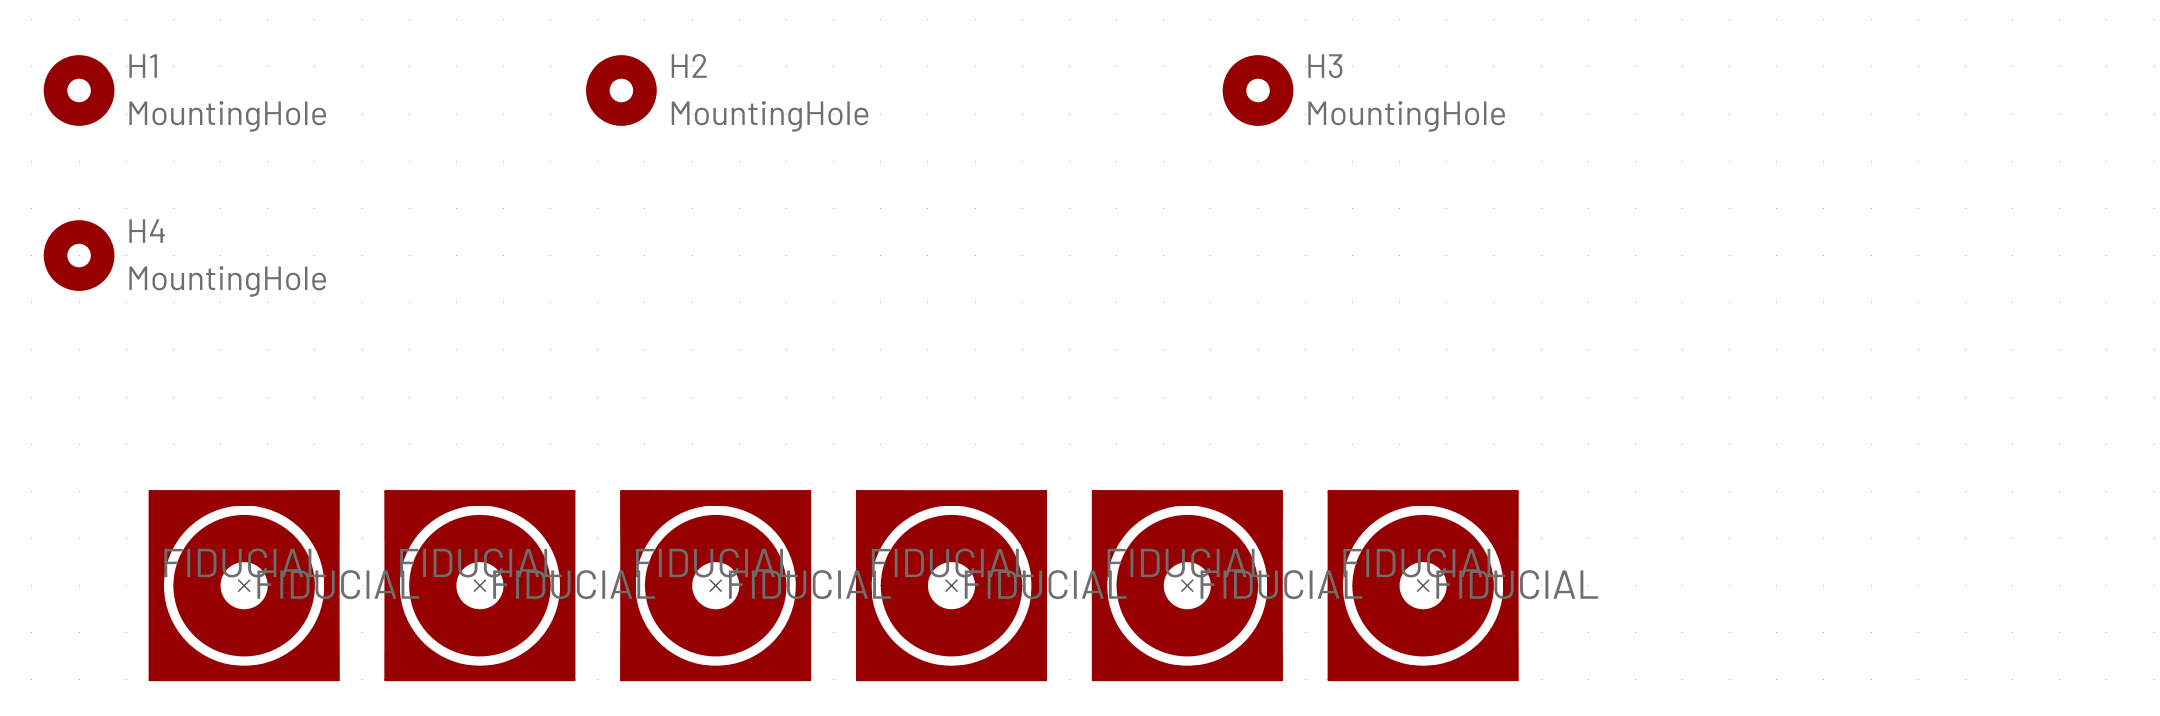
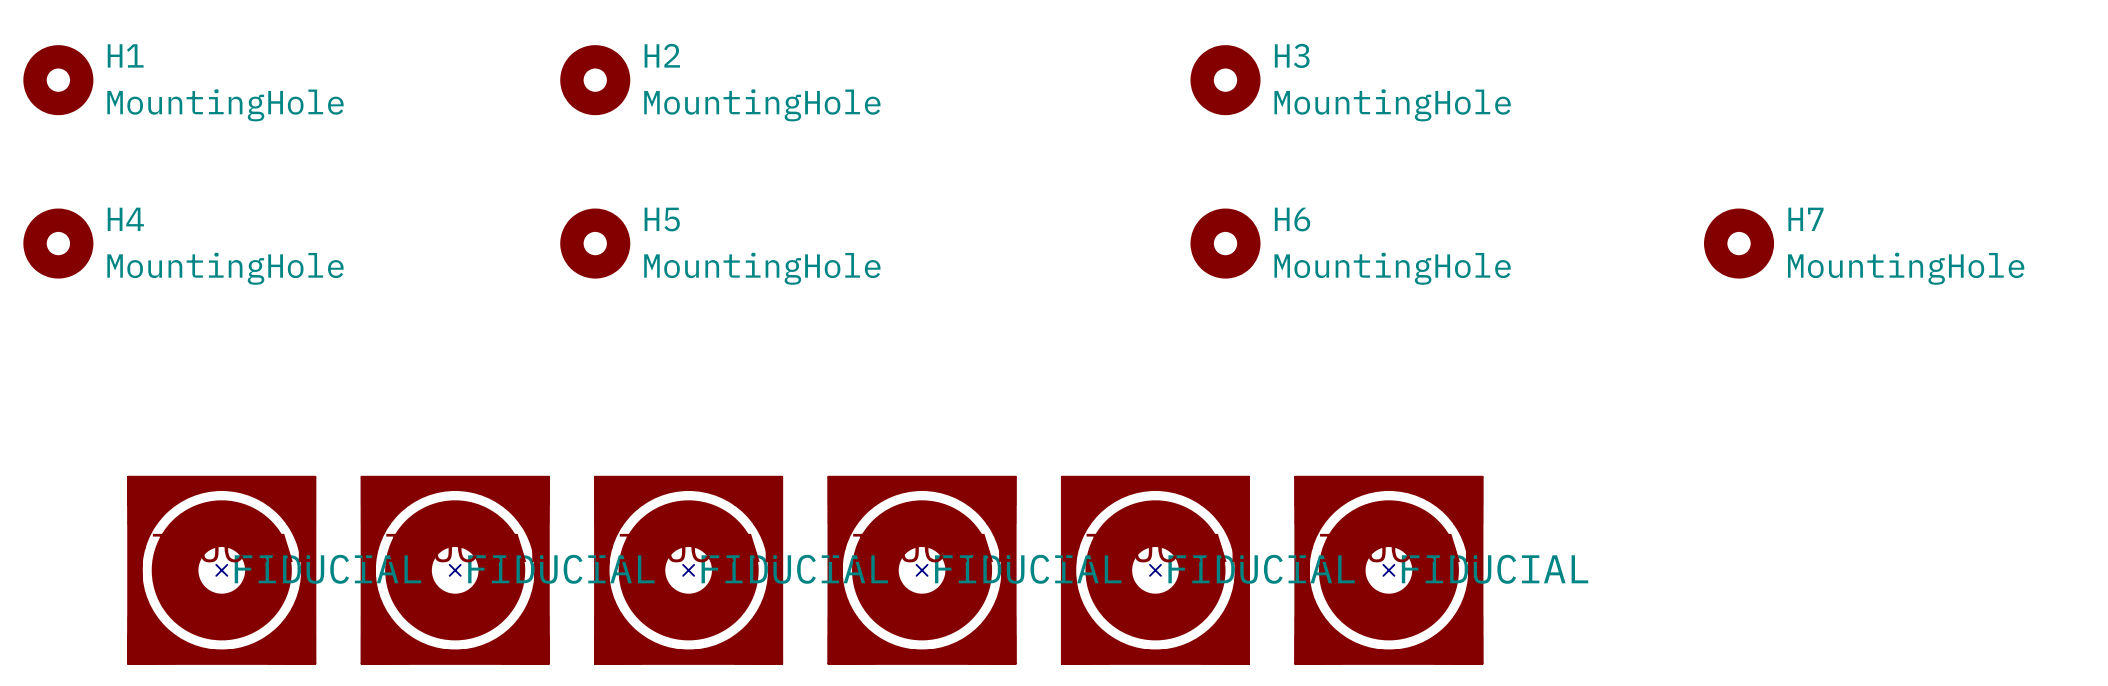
H5: none -> MountingHole (595, 243)
H6: none -> MountingHole (1225, 243)
H7: none -> MountingHole (1739, 243)

